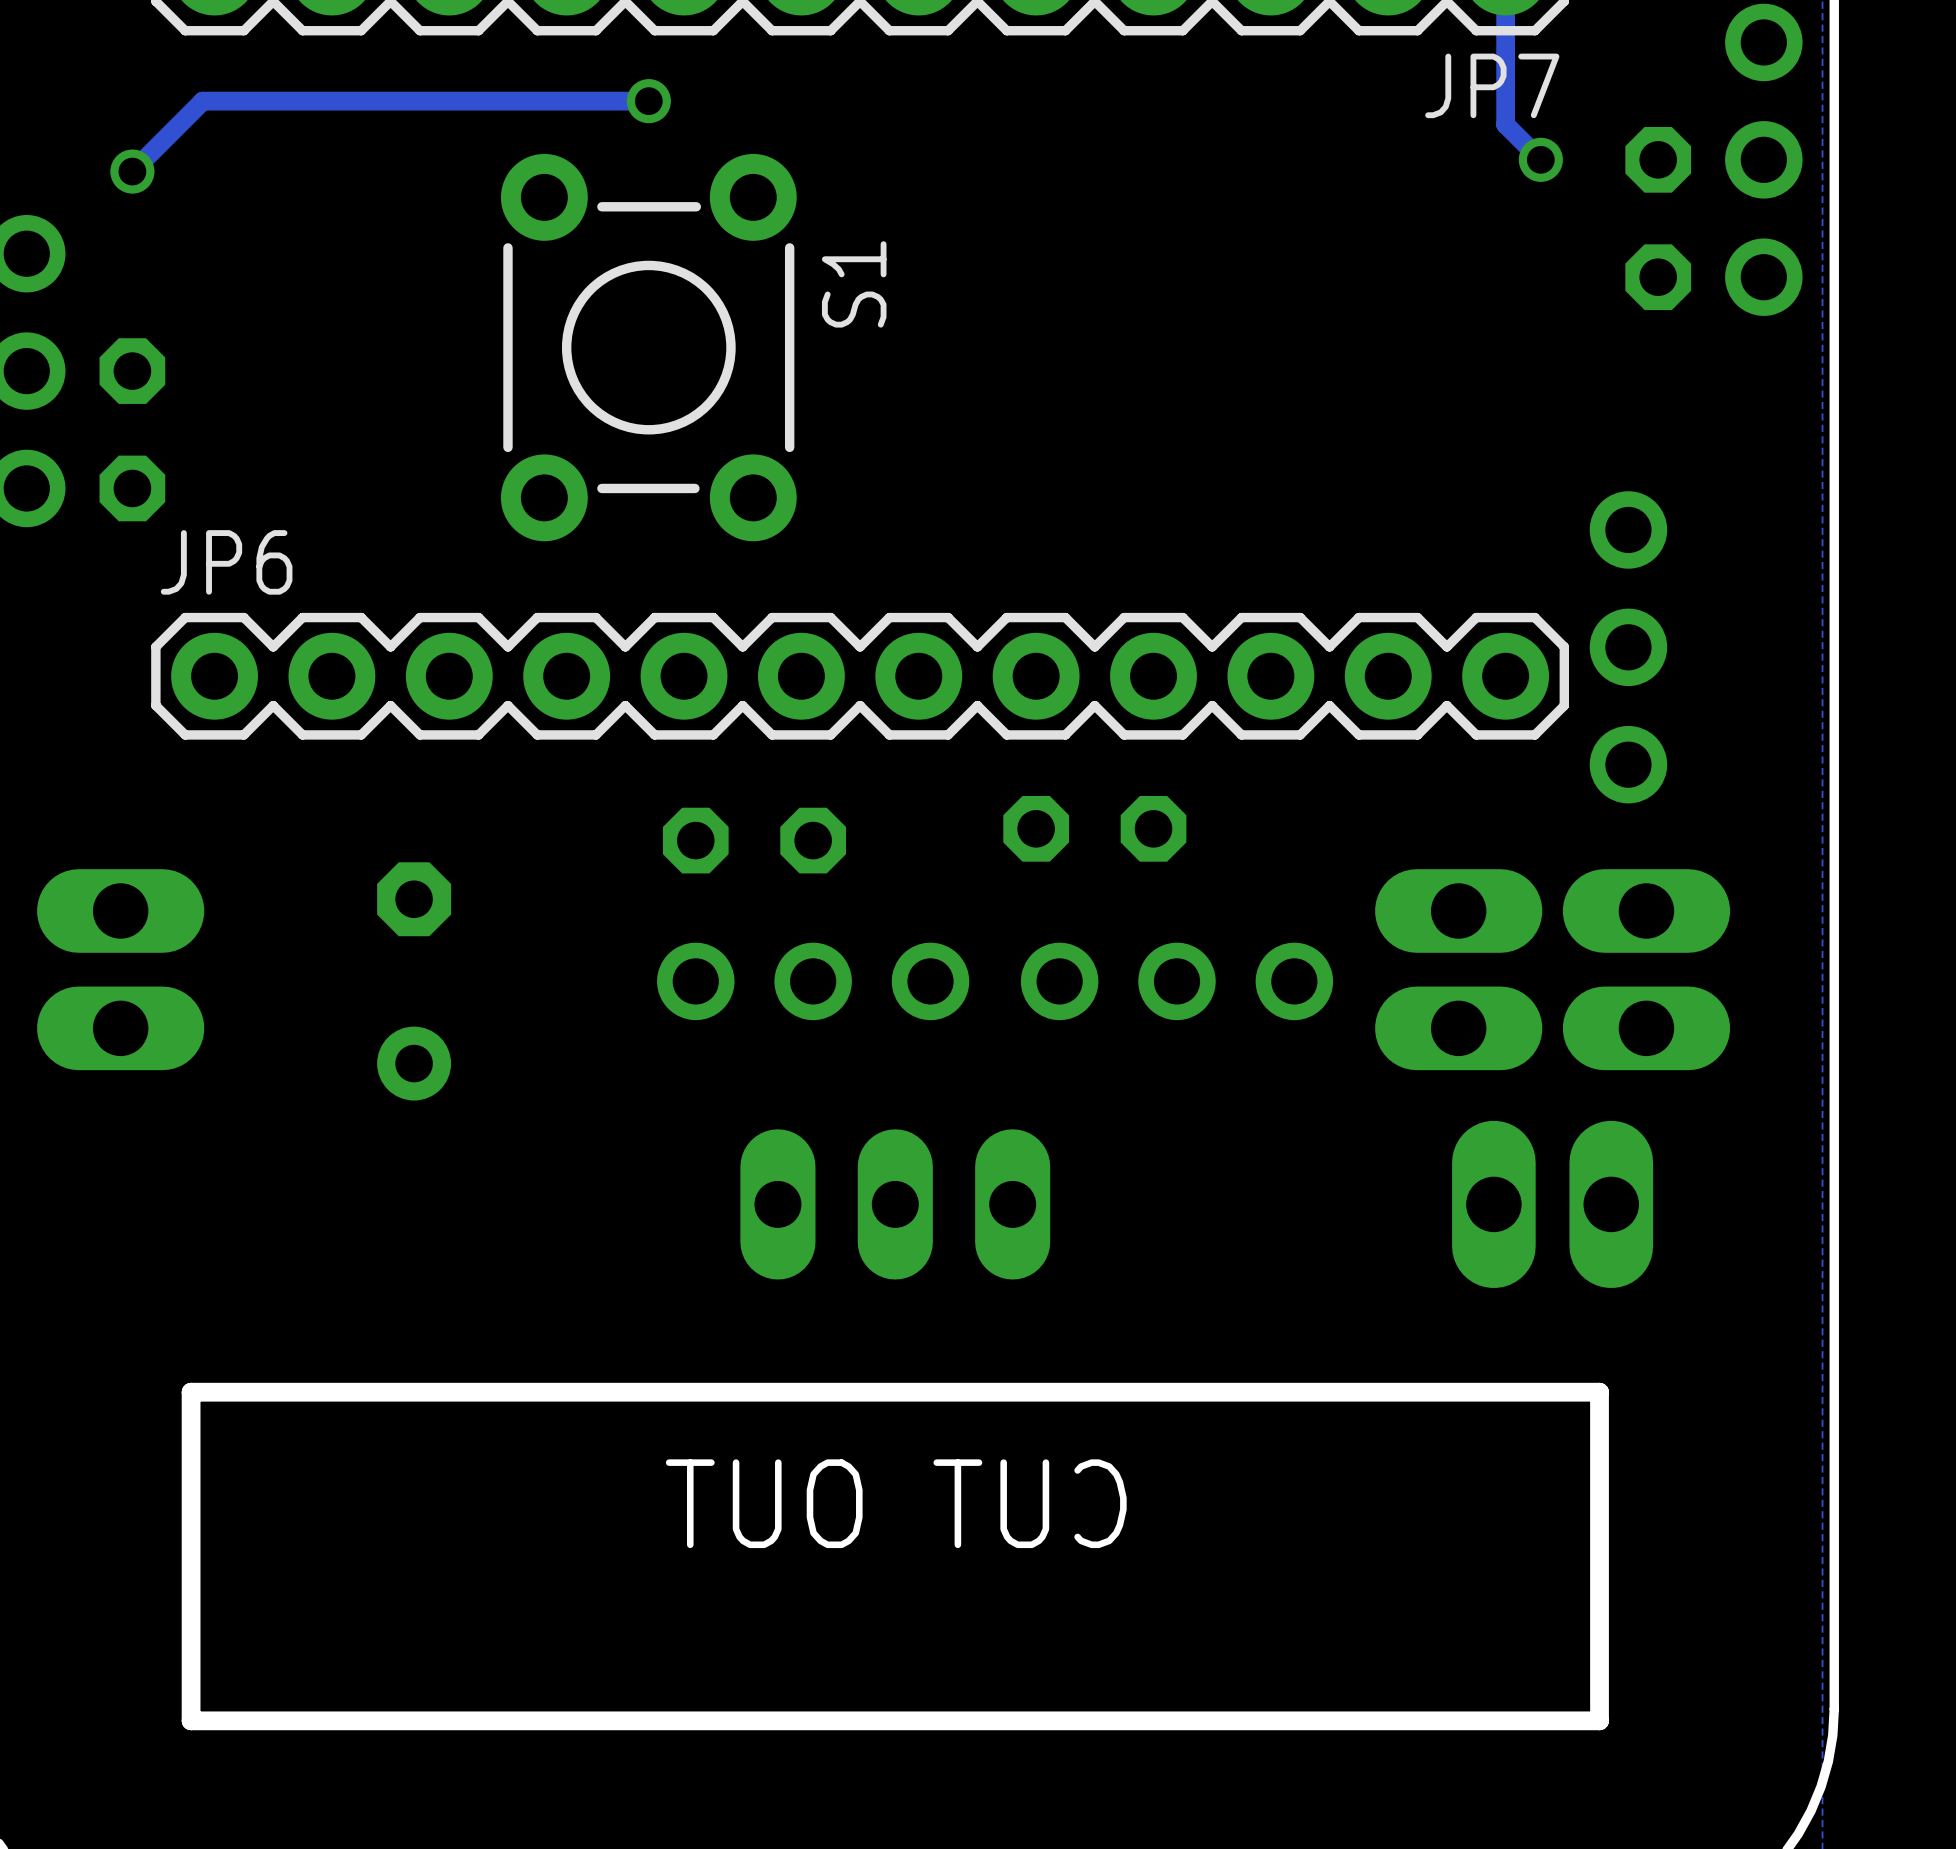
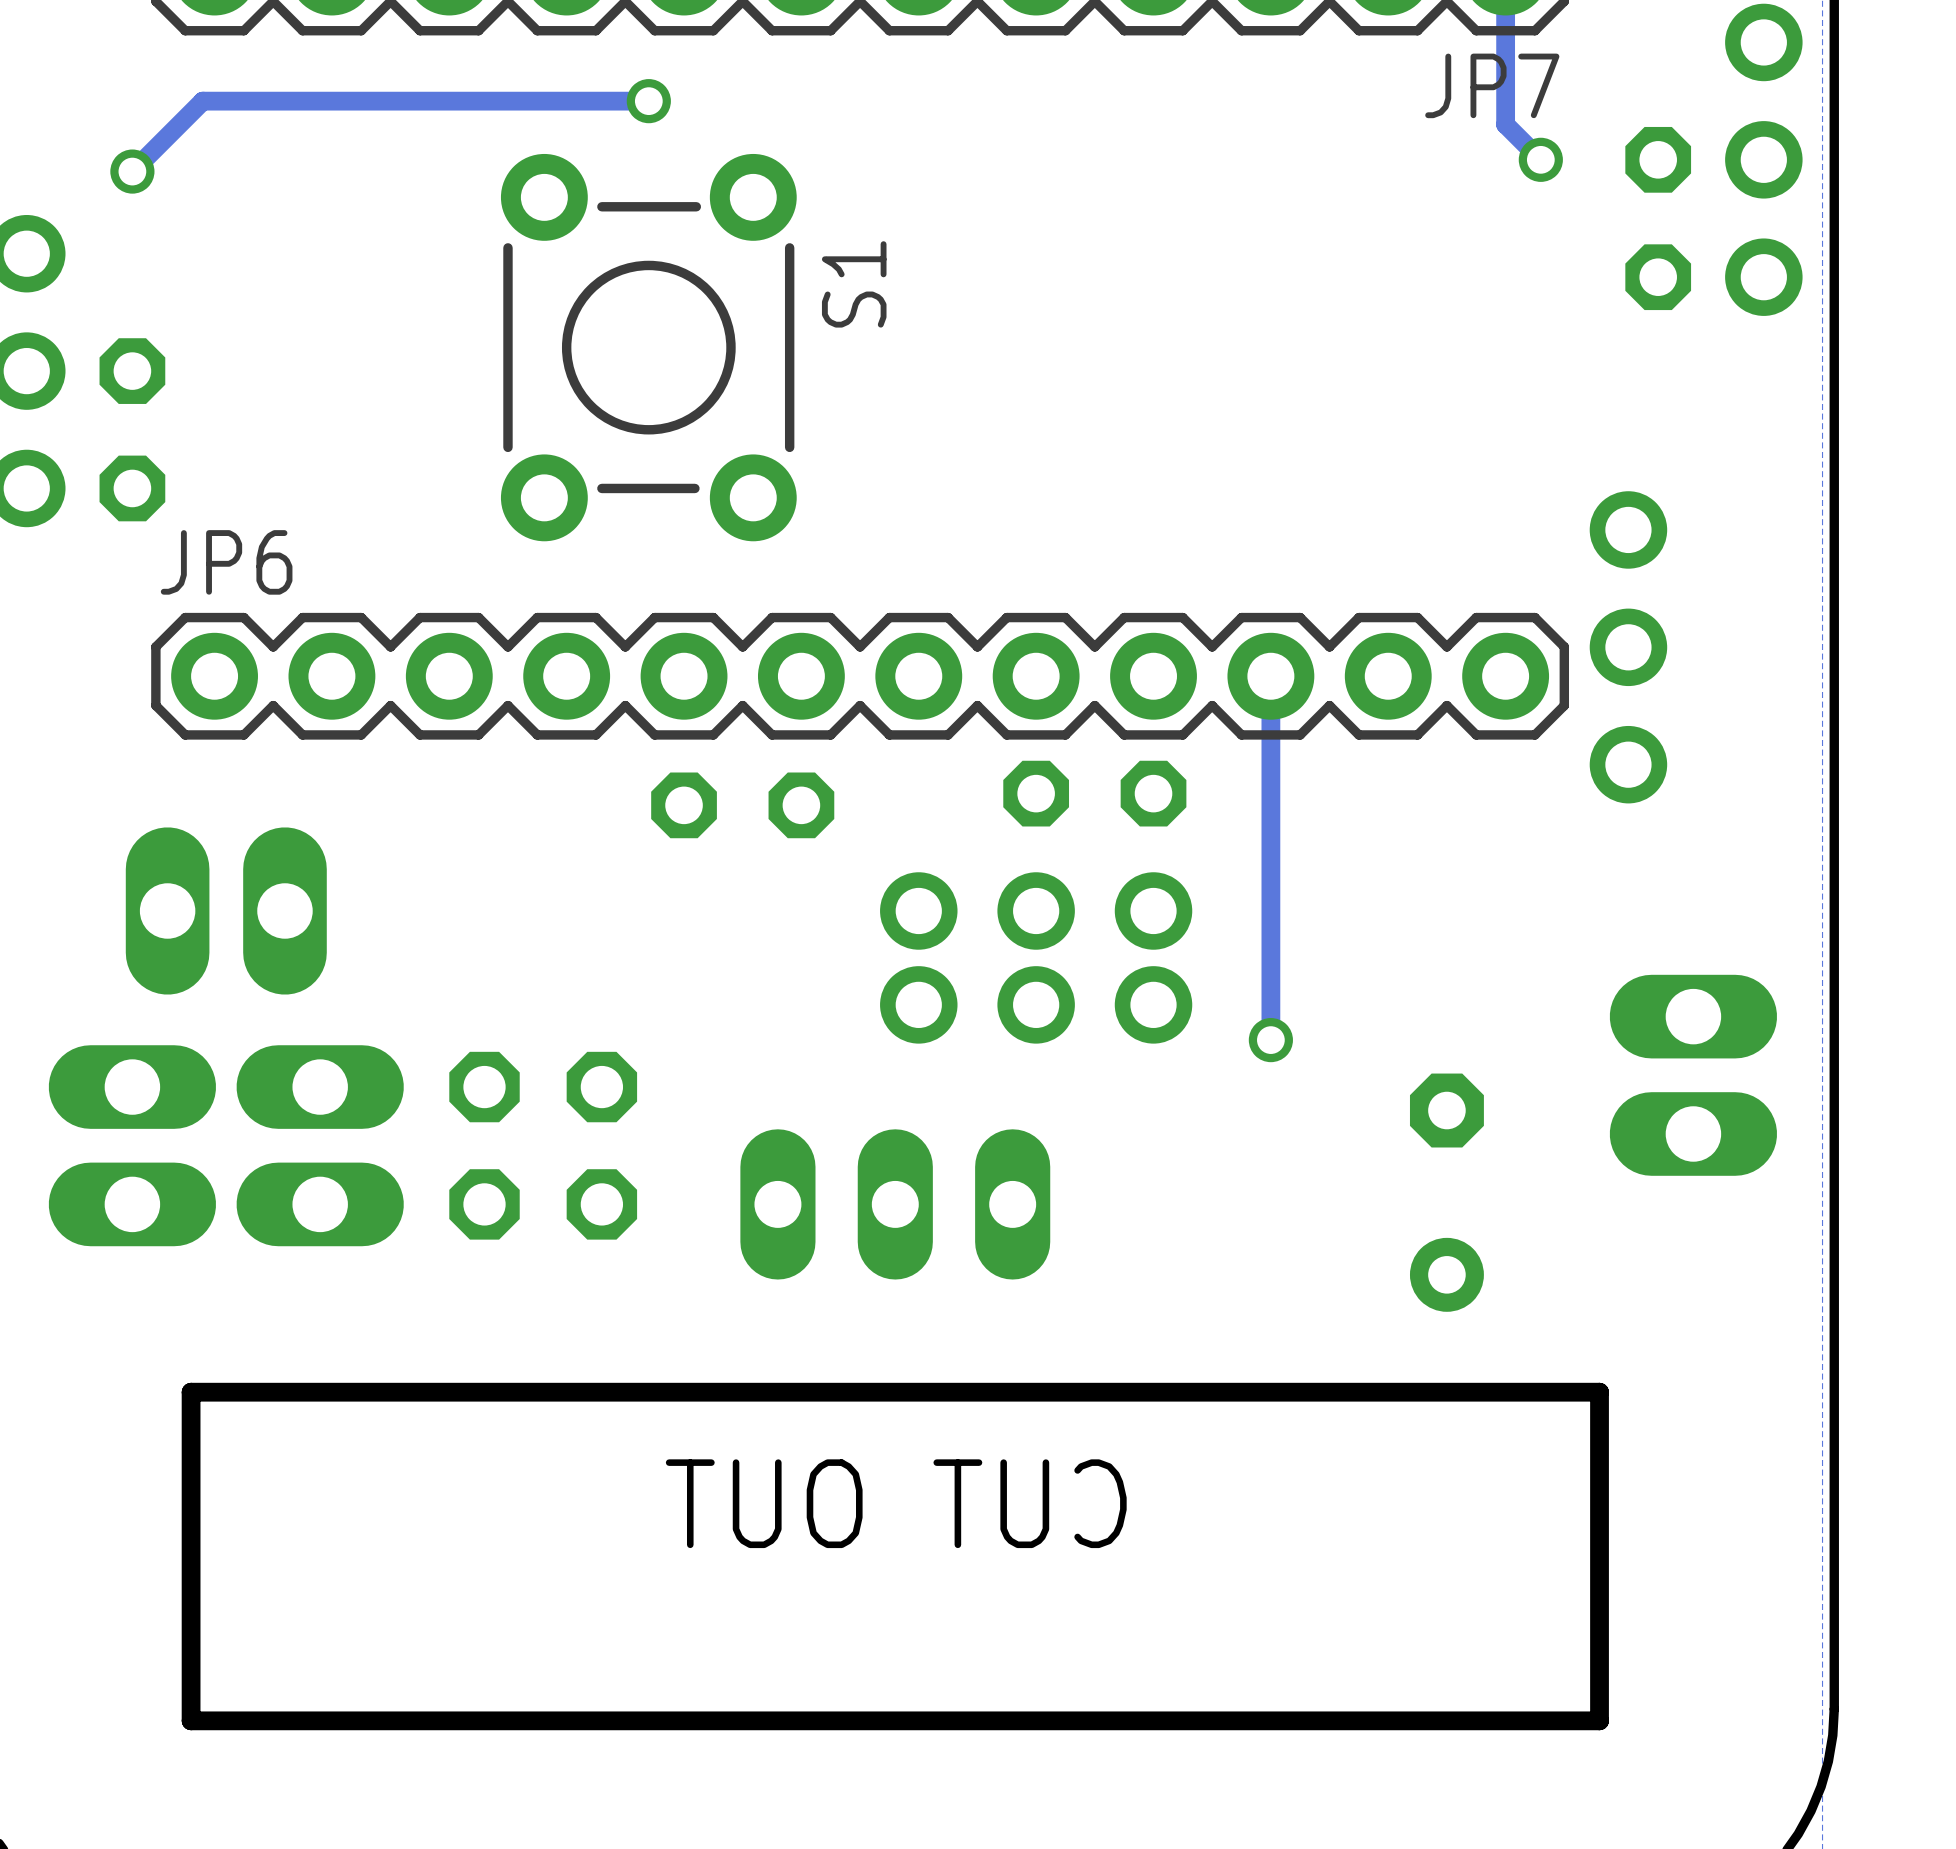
track: none -> (1270, 676) (1270, 1040)
part position: (1094, 828) -> (1094, 793)
part position: (754, 840) -> (742, 805)
part: none -> (226, 910)
part: none -> (1036, 910)
part: (120, 969) -> none
part: (1458, 969) -> none
part: (1646, 969) -> none
part position: (414, 981) -> (1446, 1192)
part: (813, 981) -> none
part: (1176, 981) -> none
part: none -> (1036, 1004)
via: none -> (1270, 1040)
part: none -> (1693, 1075)
part: none -> (132, 1145)
part: none -> (320, 1145)
part: none -> (543, 1145)
part: (1552, 1204) -> none

